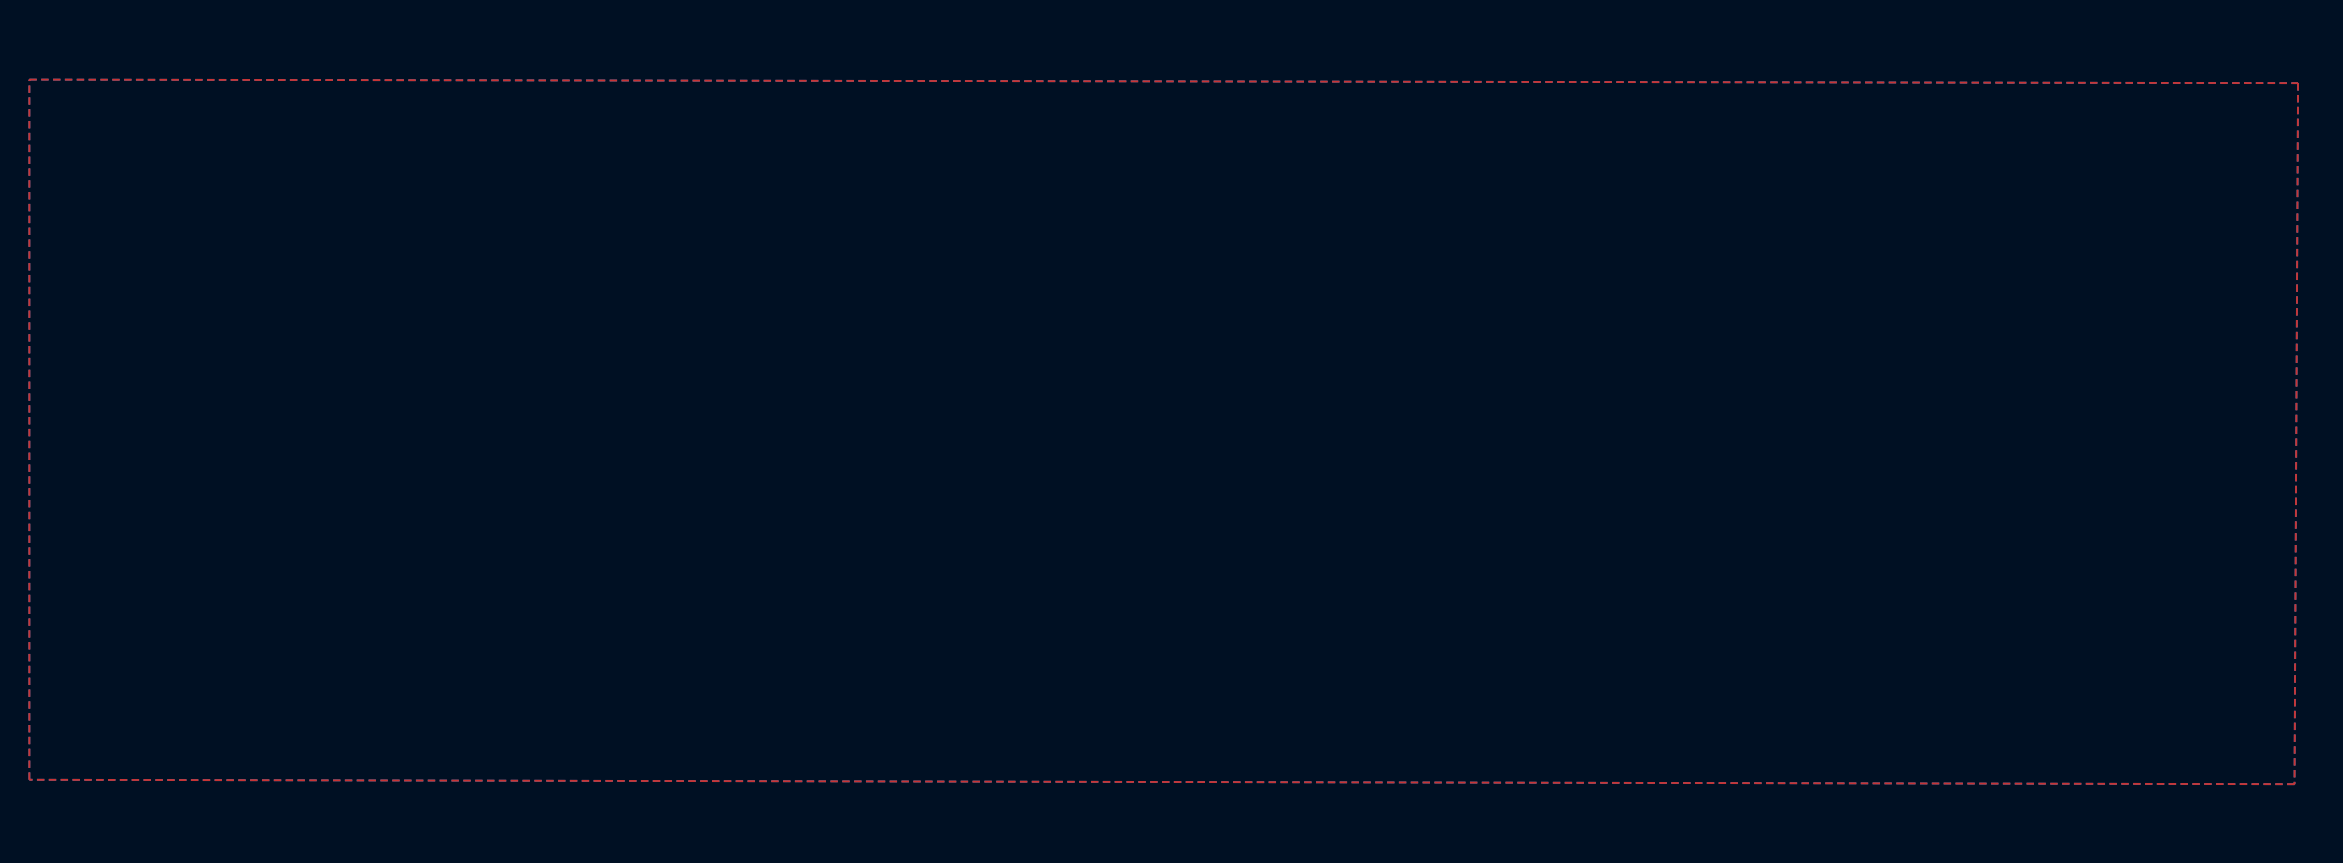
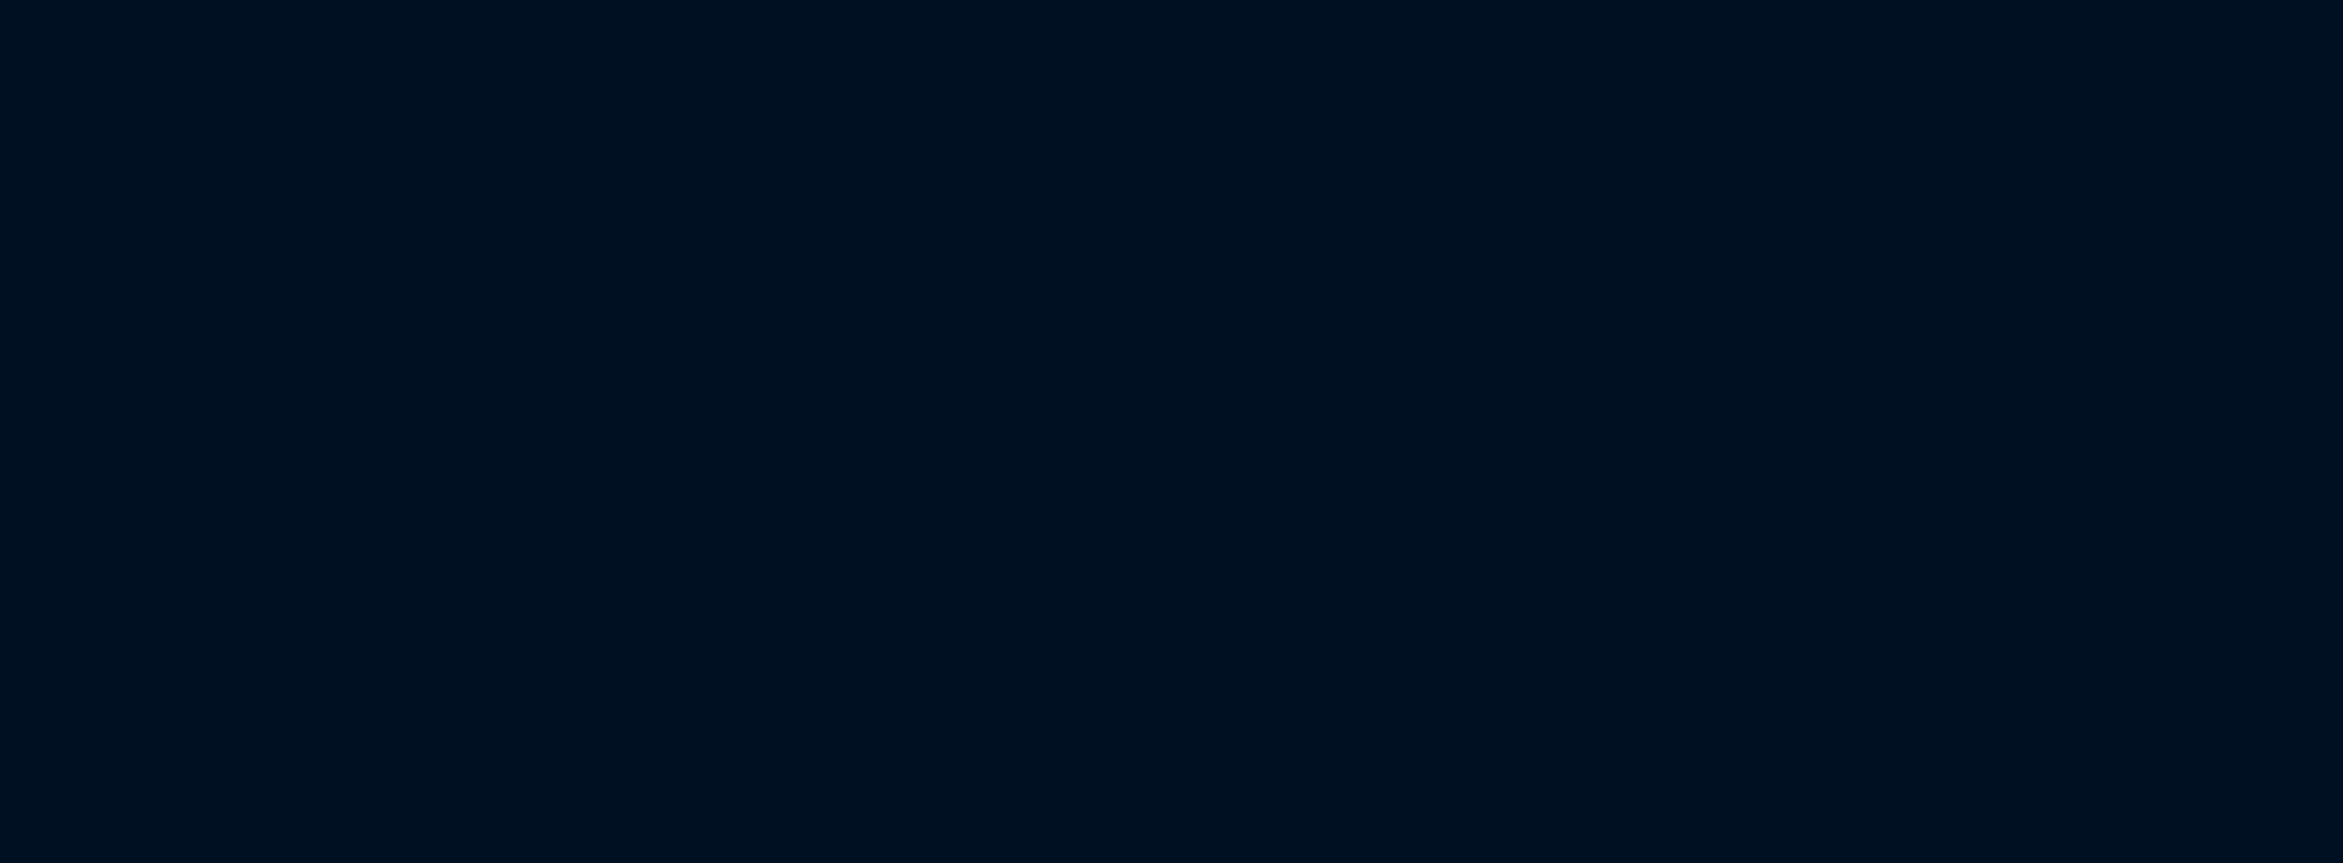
top zone outline: (29, 79) (29, 779) (2294, 784) (2298, 83) (29, 79) -> none

